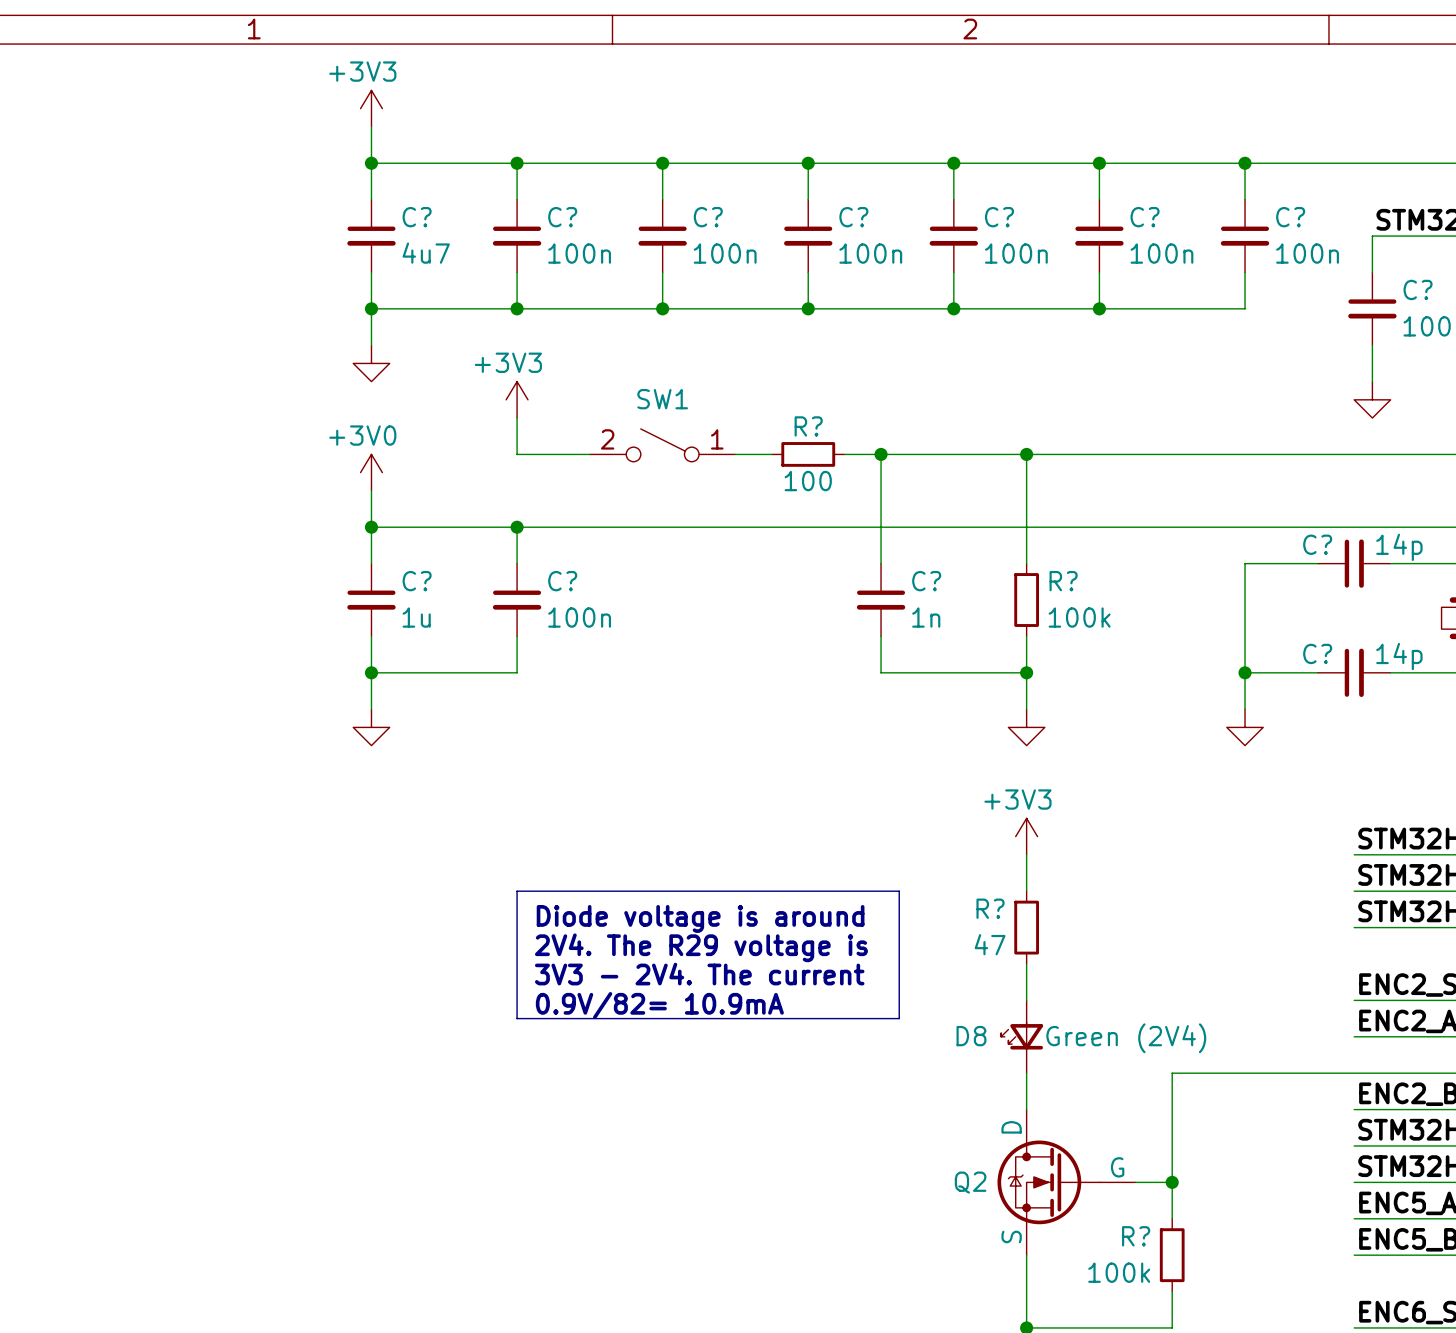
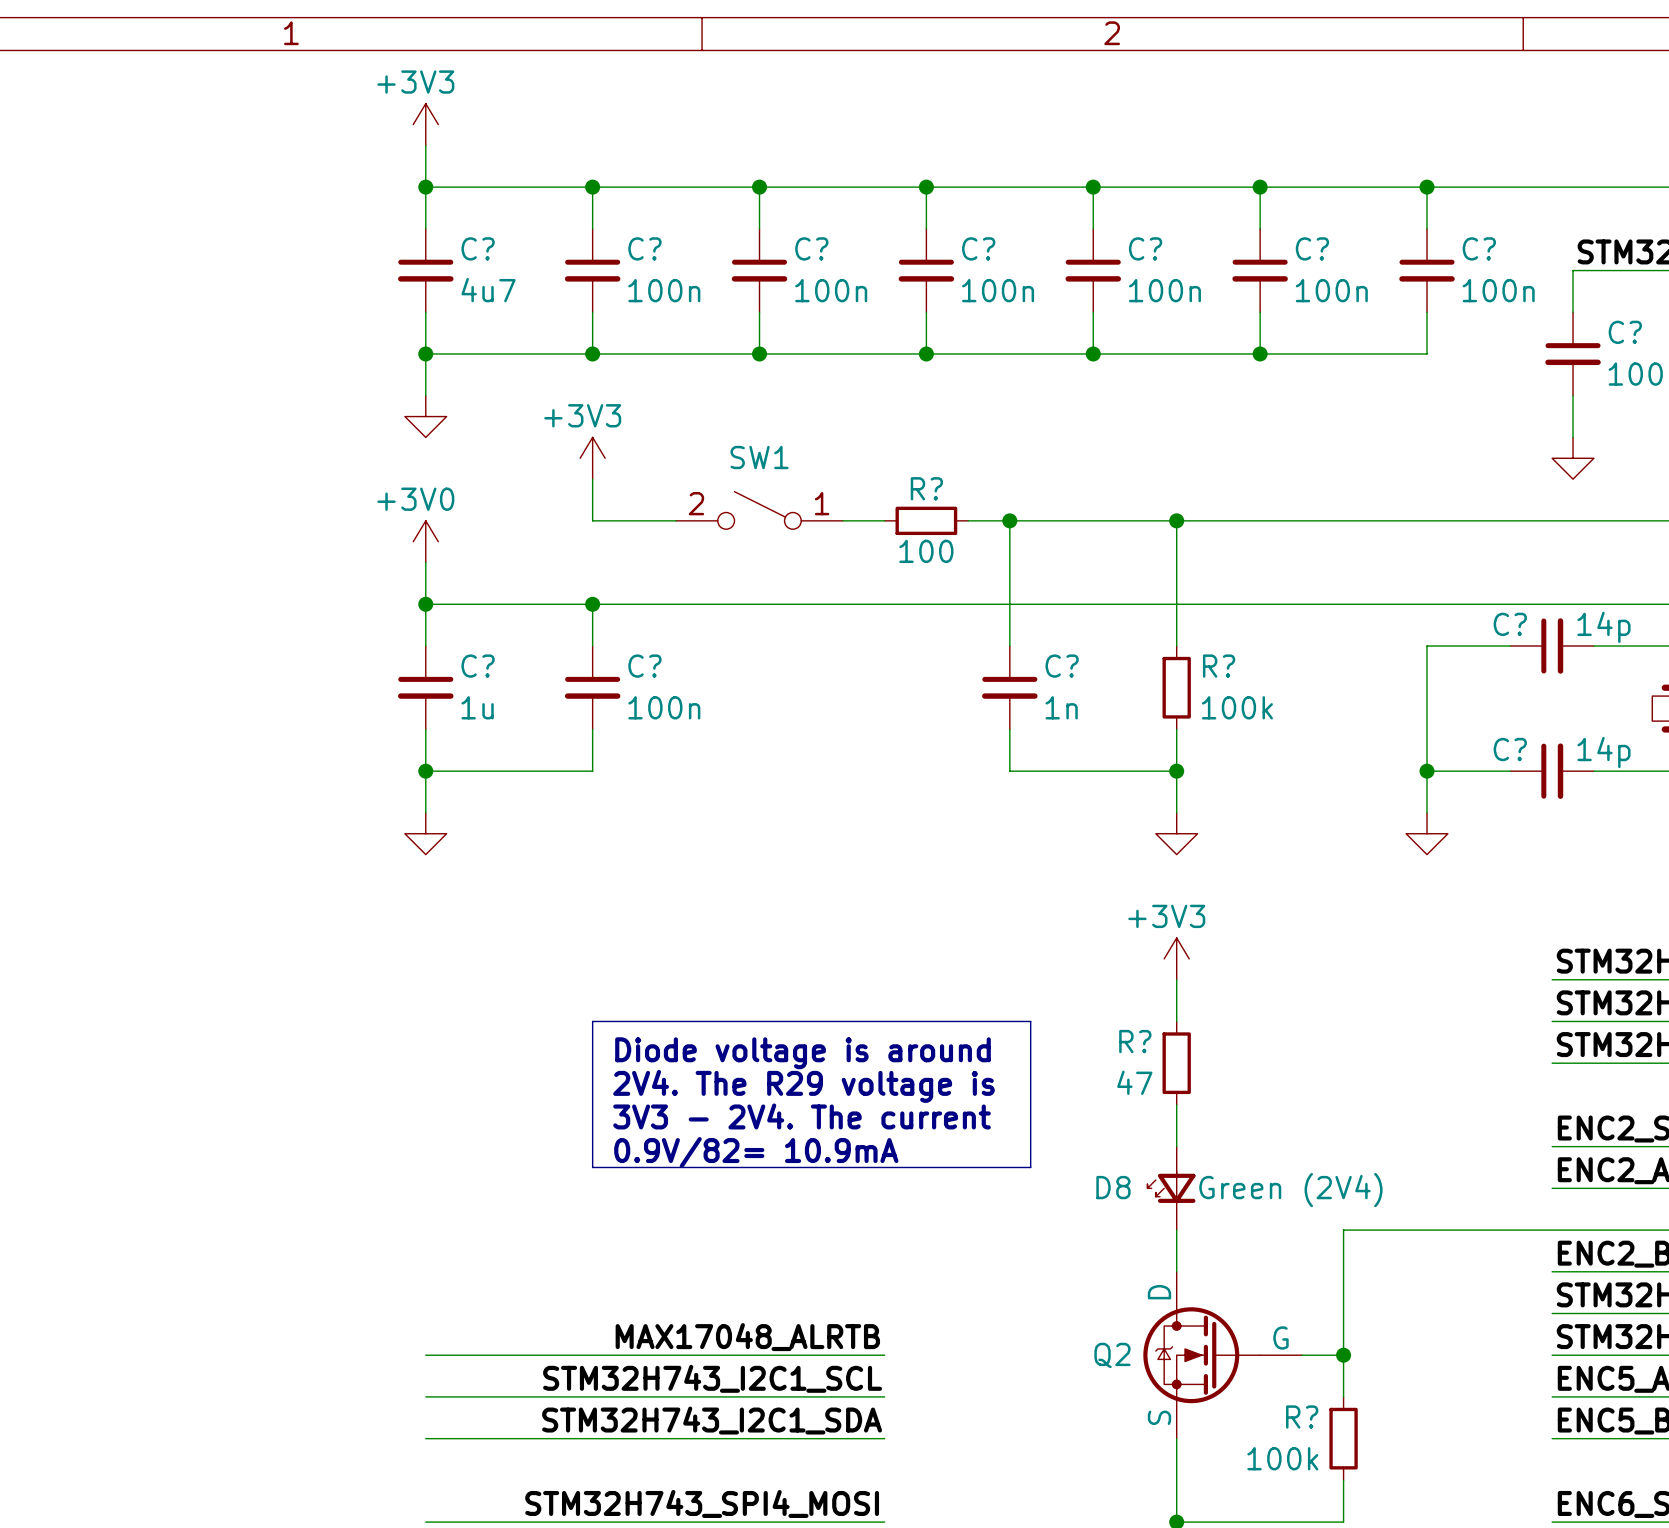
label: none -> MAX17048_ALRTB (747, 1337)
wire: none -> (425, 1355) (884, 1355)
label: none -> STM32H743_I2C1_SCL (712, 1378)
wire: none -> (425, 1396) (884, 1396)
label: none -> STM32H743_I2C1_SDA (712, 1420)
wire: none -> (425, 1438) (884, 1438)
label: none -> STM32H743_SPI4_MOSI (702, 1503)
wire: none -> (425, 1522) (884, 1522)

